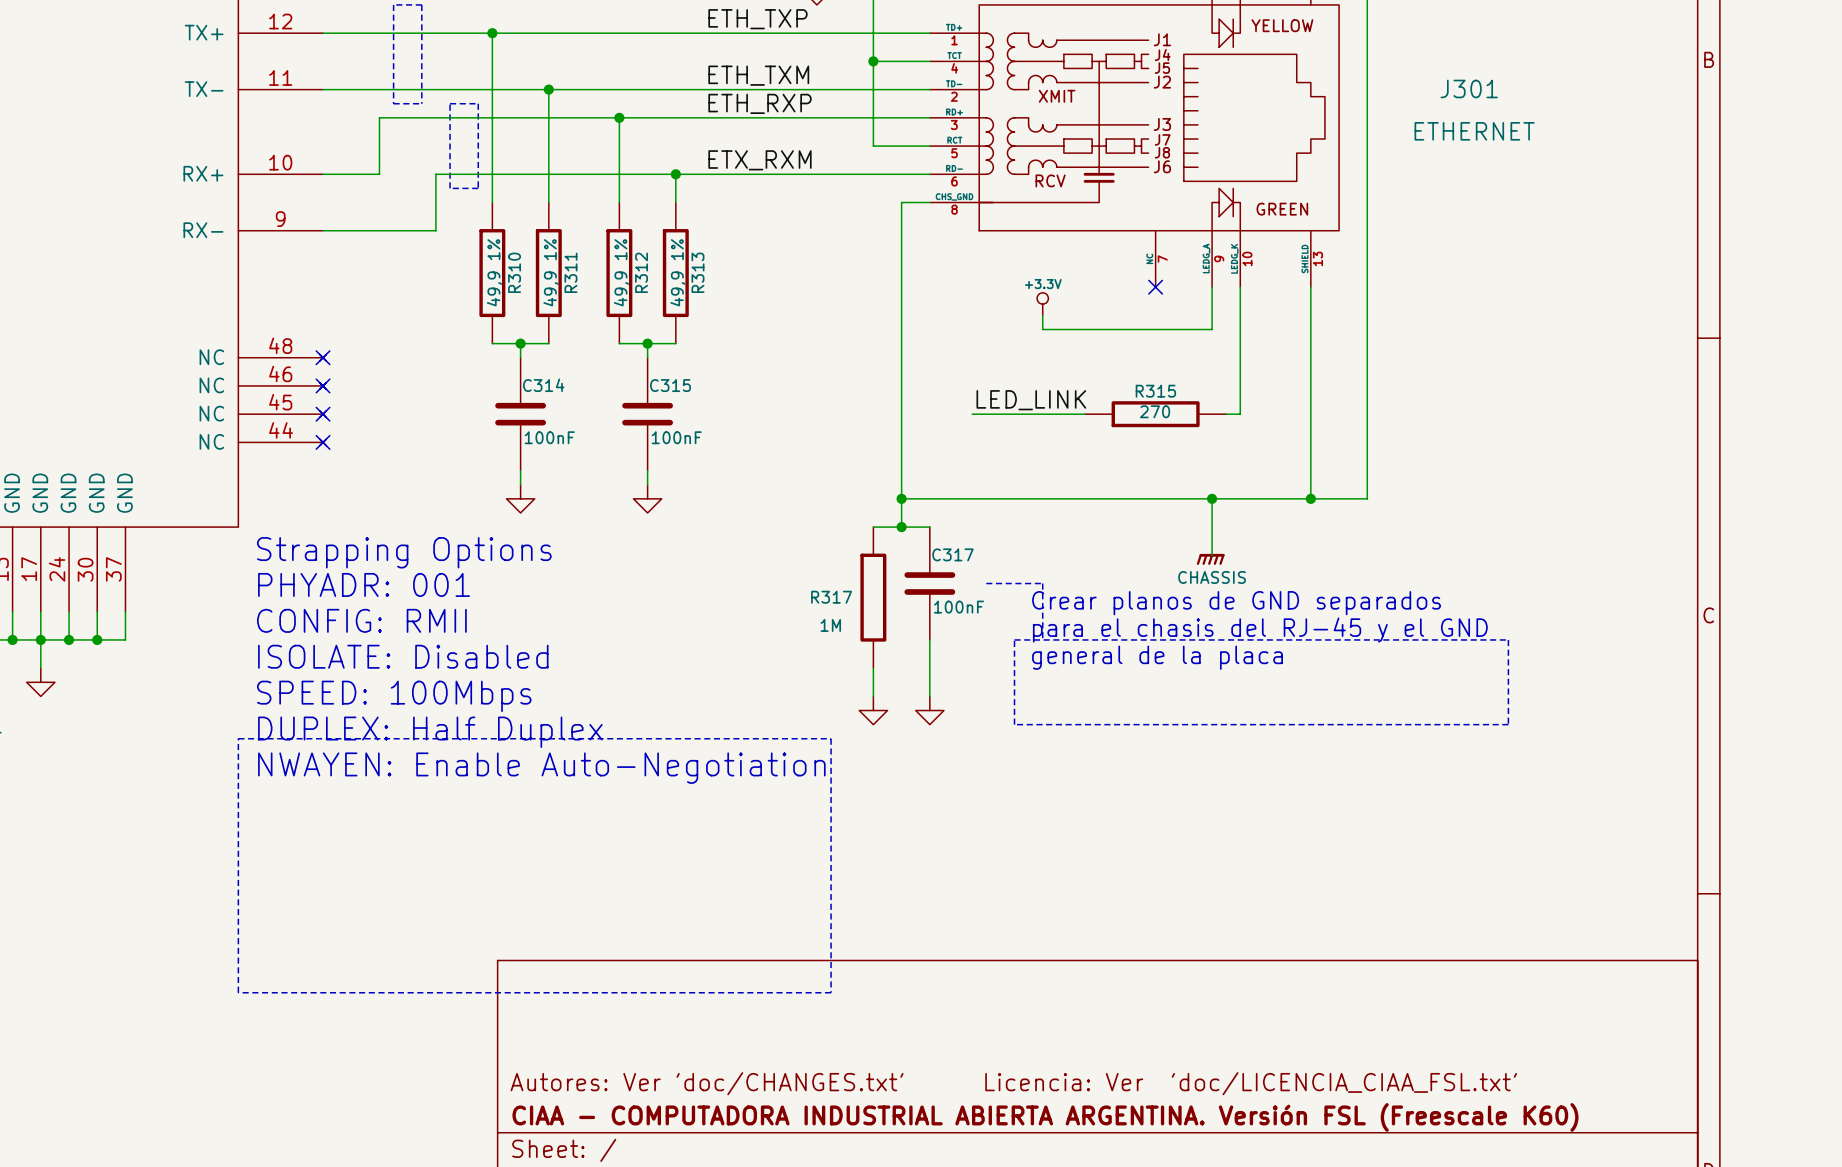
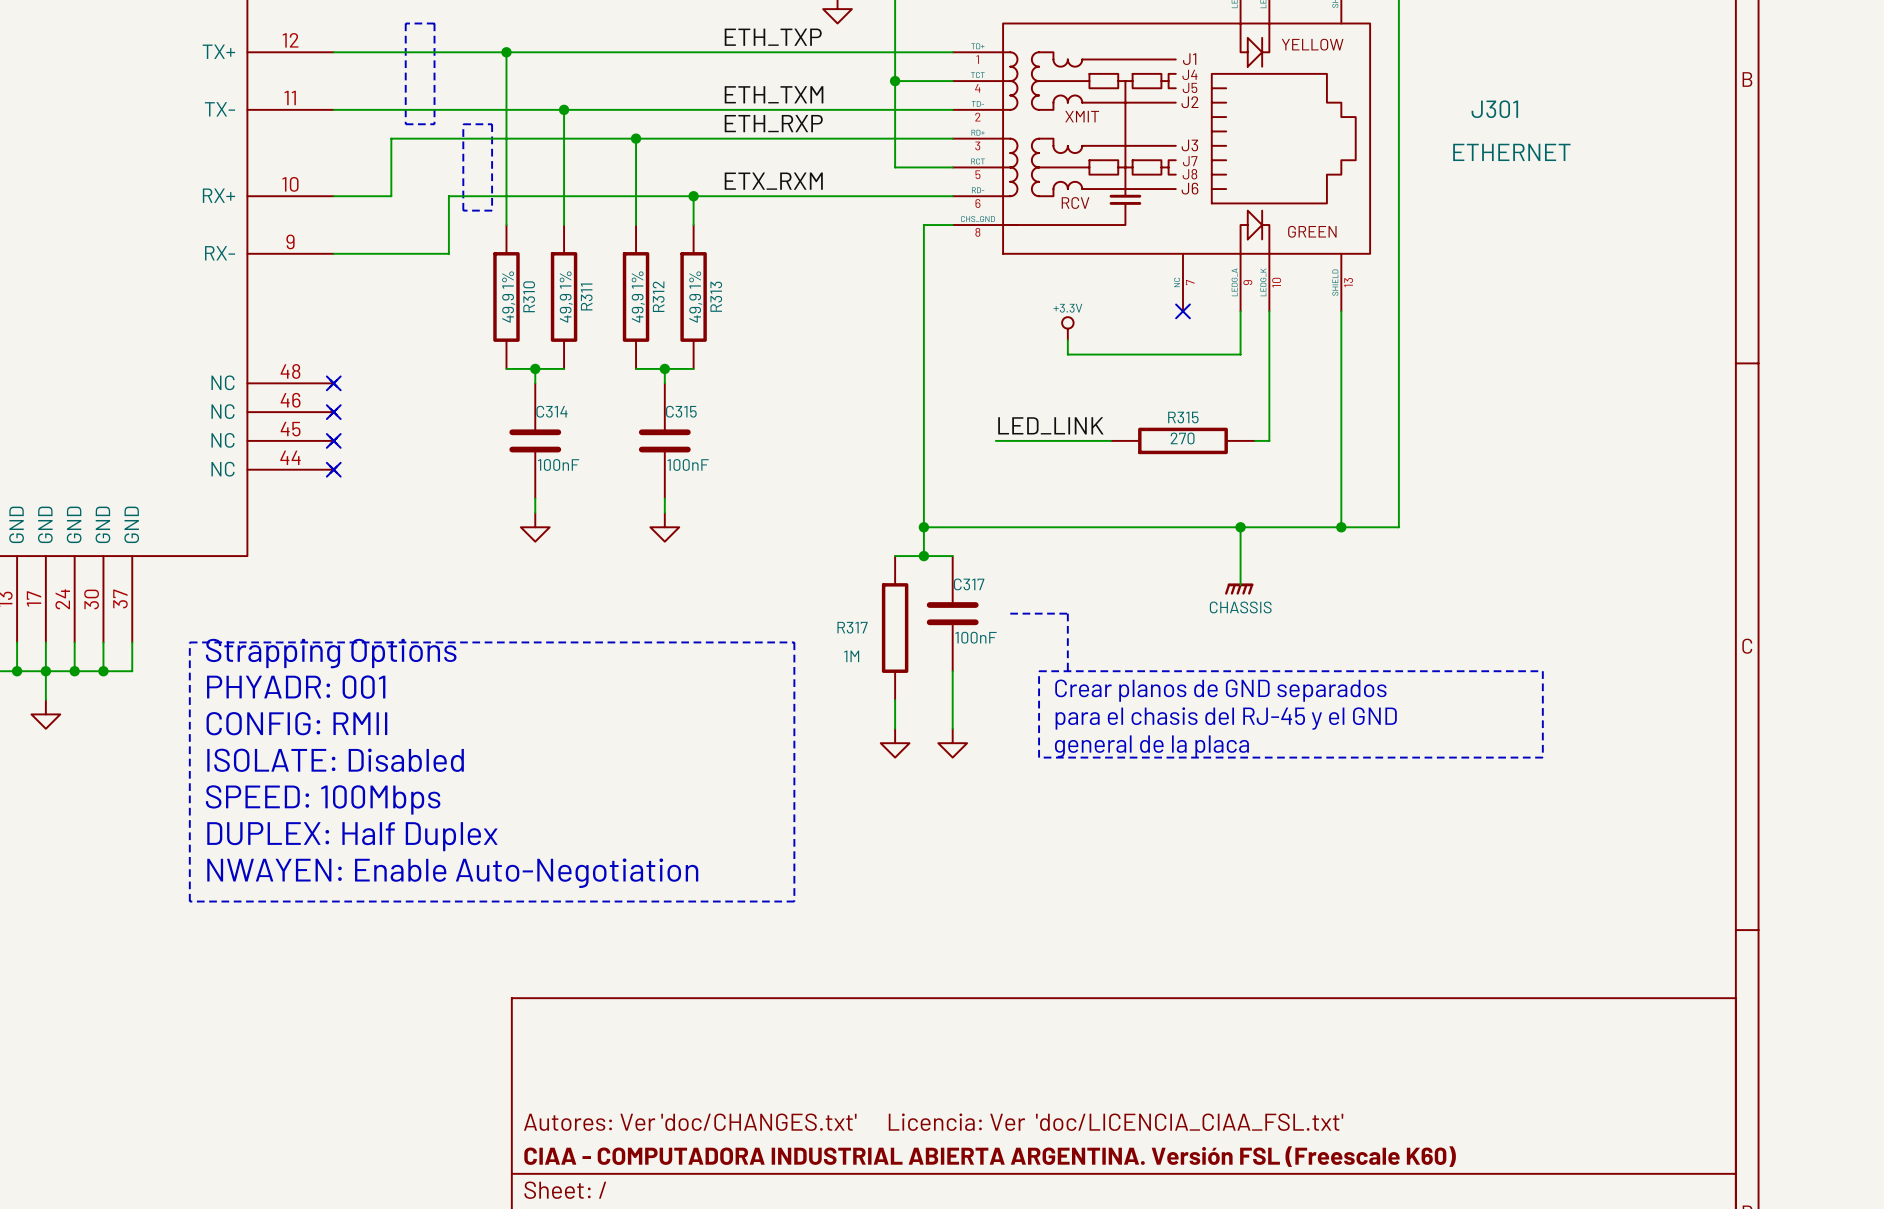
text position: Strapping Options (404, 552) -> Strapping Options (331, 653)
text position: PHYADR: 001 (364, 584) -> PHYADR: 001 (296, 687)
text: Crear planos de GND separados (1236, 603) -> none
text position: CONFIG: RMII (361, 620) -> CONFIG: RMII (296, 723)
text position: para el chasis del RJ-45 y el GND (1260, 630) -> para el chasis del RJ-45 y el GND (1226, 718)
text position: ISOLATE: Disabled (403, 656) -> ISOLATE: Disabled (335, 760)
text: general de la placa (1157, 657) -> Crear planos de GND separados (1220, 690)
text position: SPEED: 100Mbps (394, 696) -> SPEED: 100Mbps (323, 799)
text: none -> general de la placa (1151, 746)
text position: DUPLEX: Half Duplex (430, 732) -> DUPLEX: Half Duplex (352, 836)
line: (238, 738) (831, 738) (831, 992) (238, 992) (238, 738) -> (189, 642) (794, 642) (794, 901) (189, 901) (189, 642)
text position: NWAYEN: Enable Auto-Negotiation (541, 768) -> NWAYEN: Enable Auto-Negotiation (452, 873)

